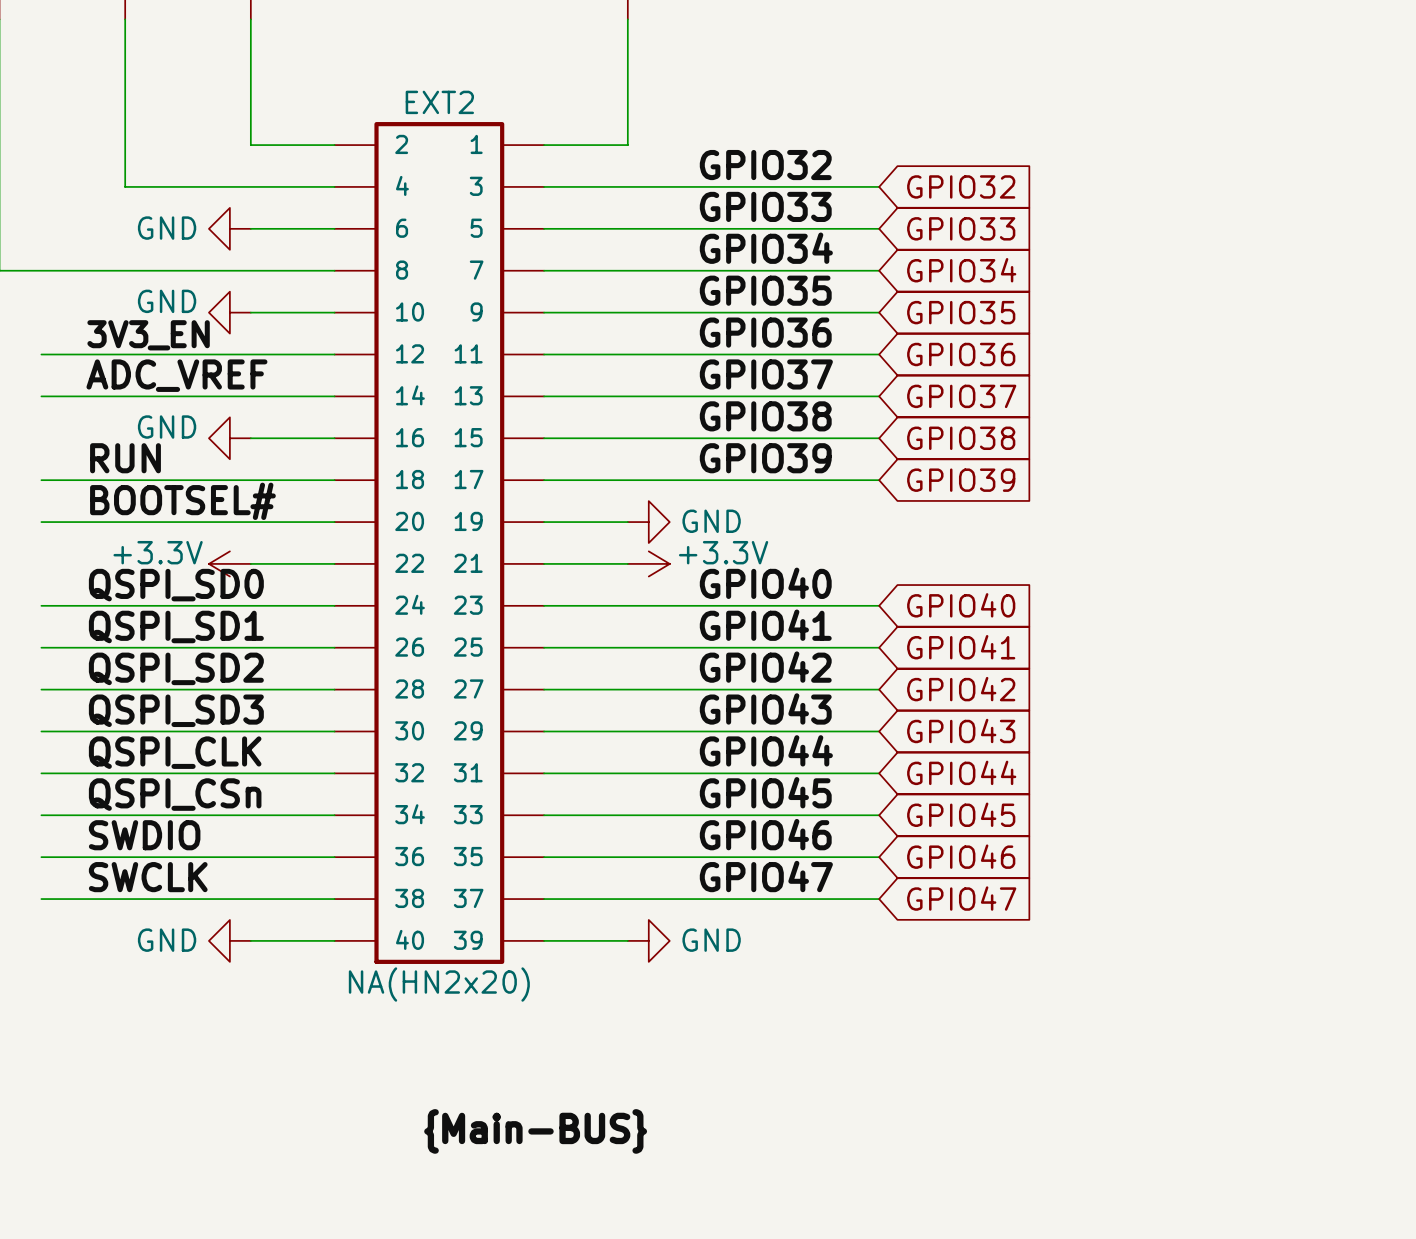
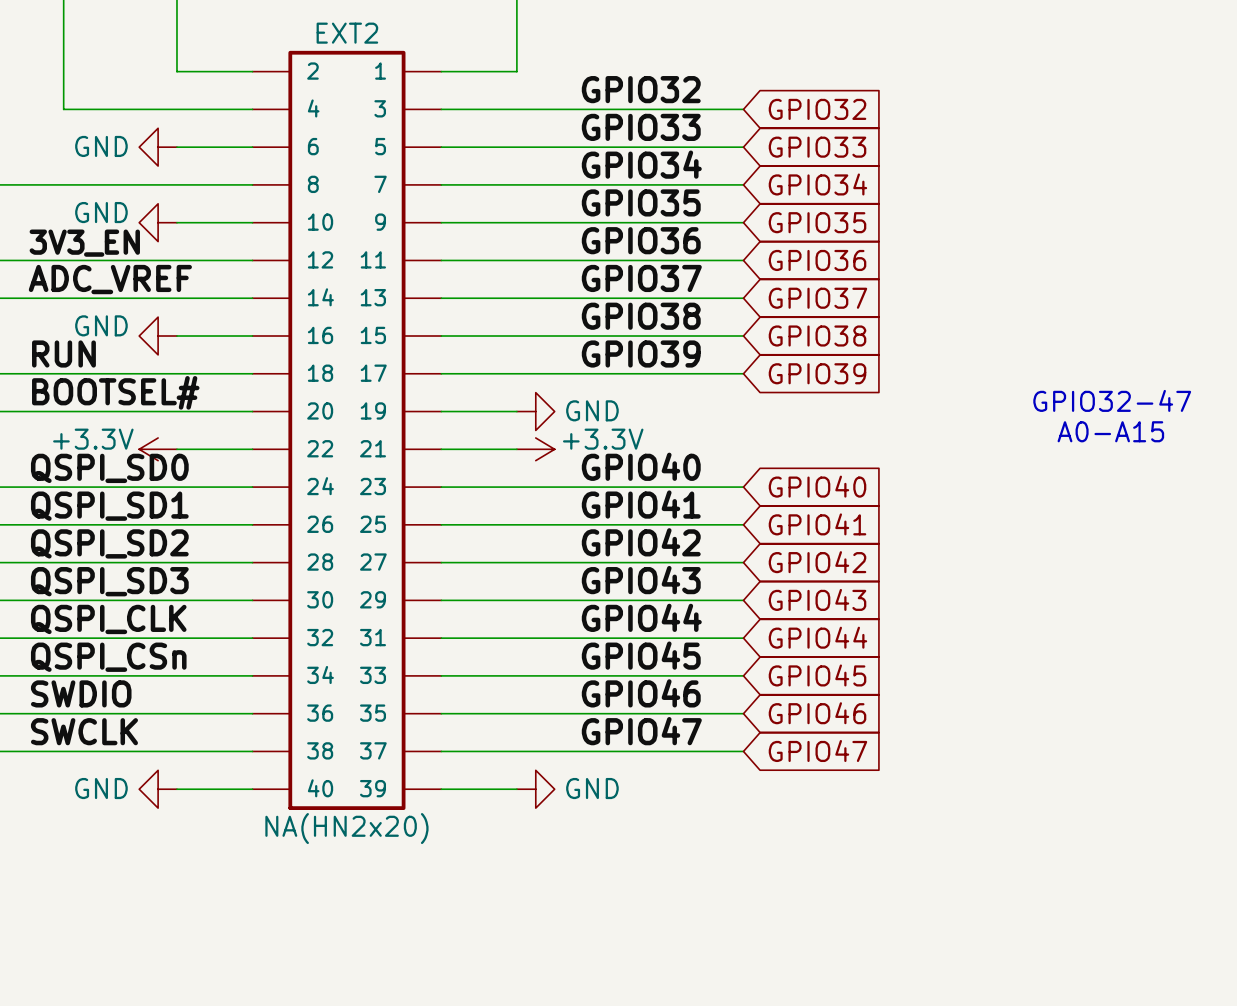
text: none -> GPIO32-47 (1112, 400)
text: none -> A0-A15 (1110, 431)
label: {Main-BUS} (535, 1131) -> none

